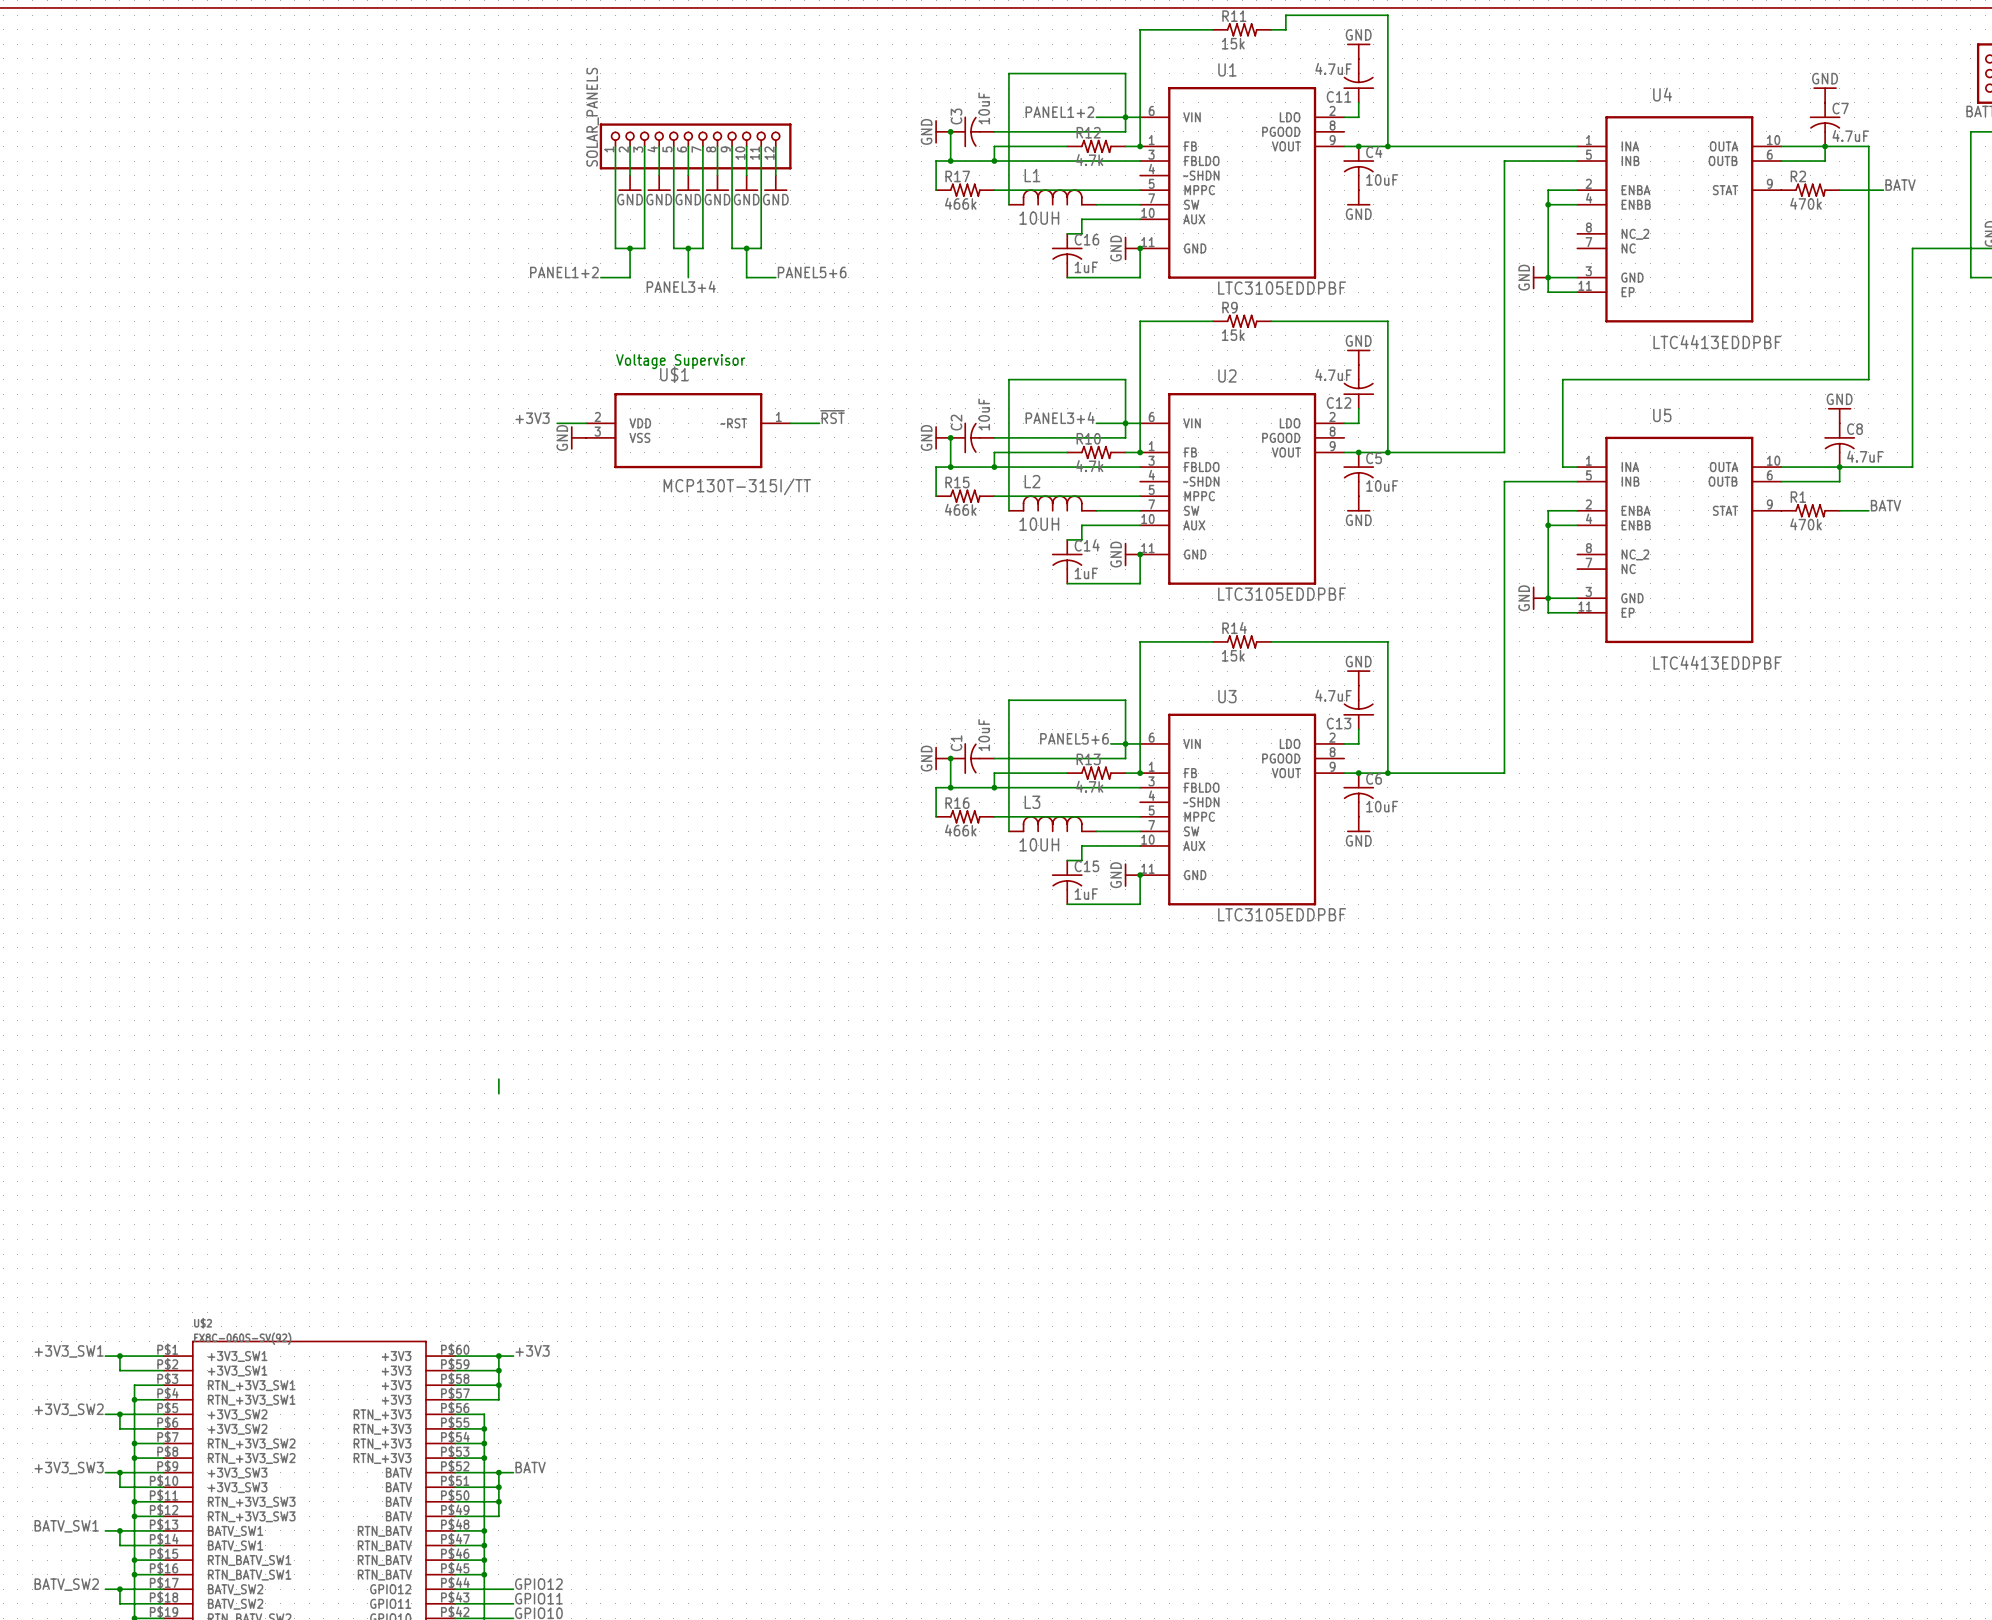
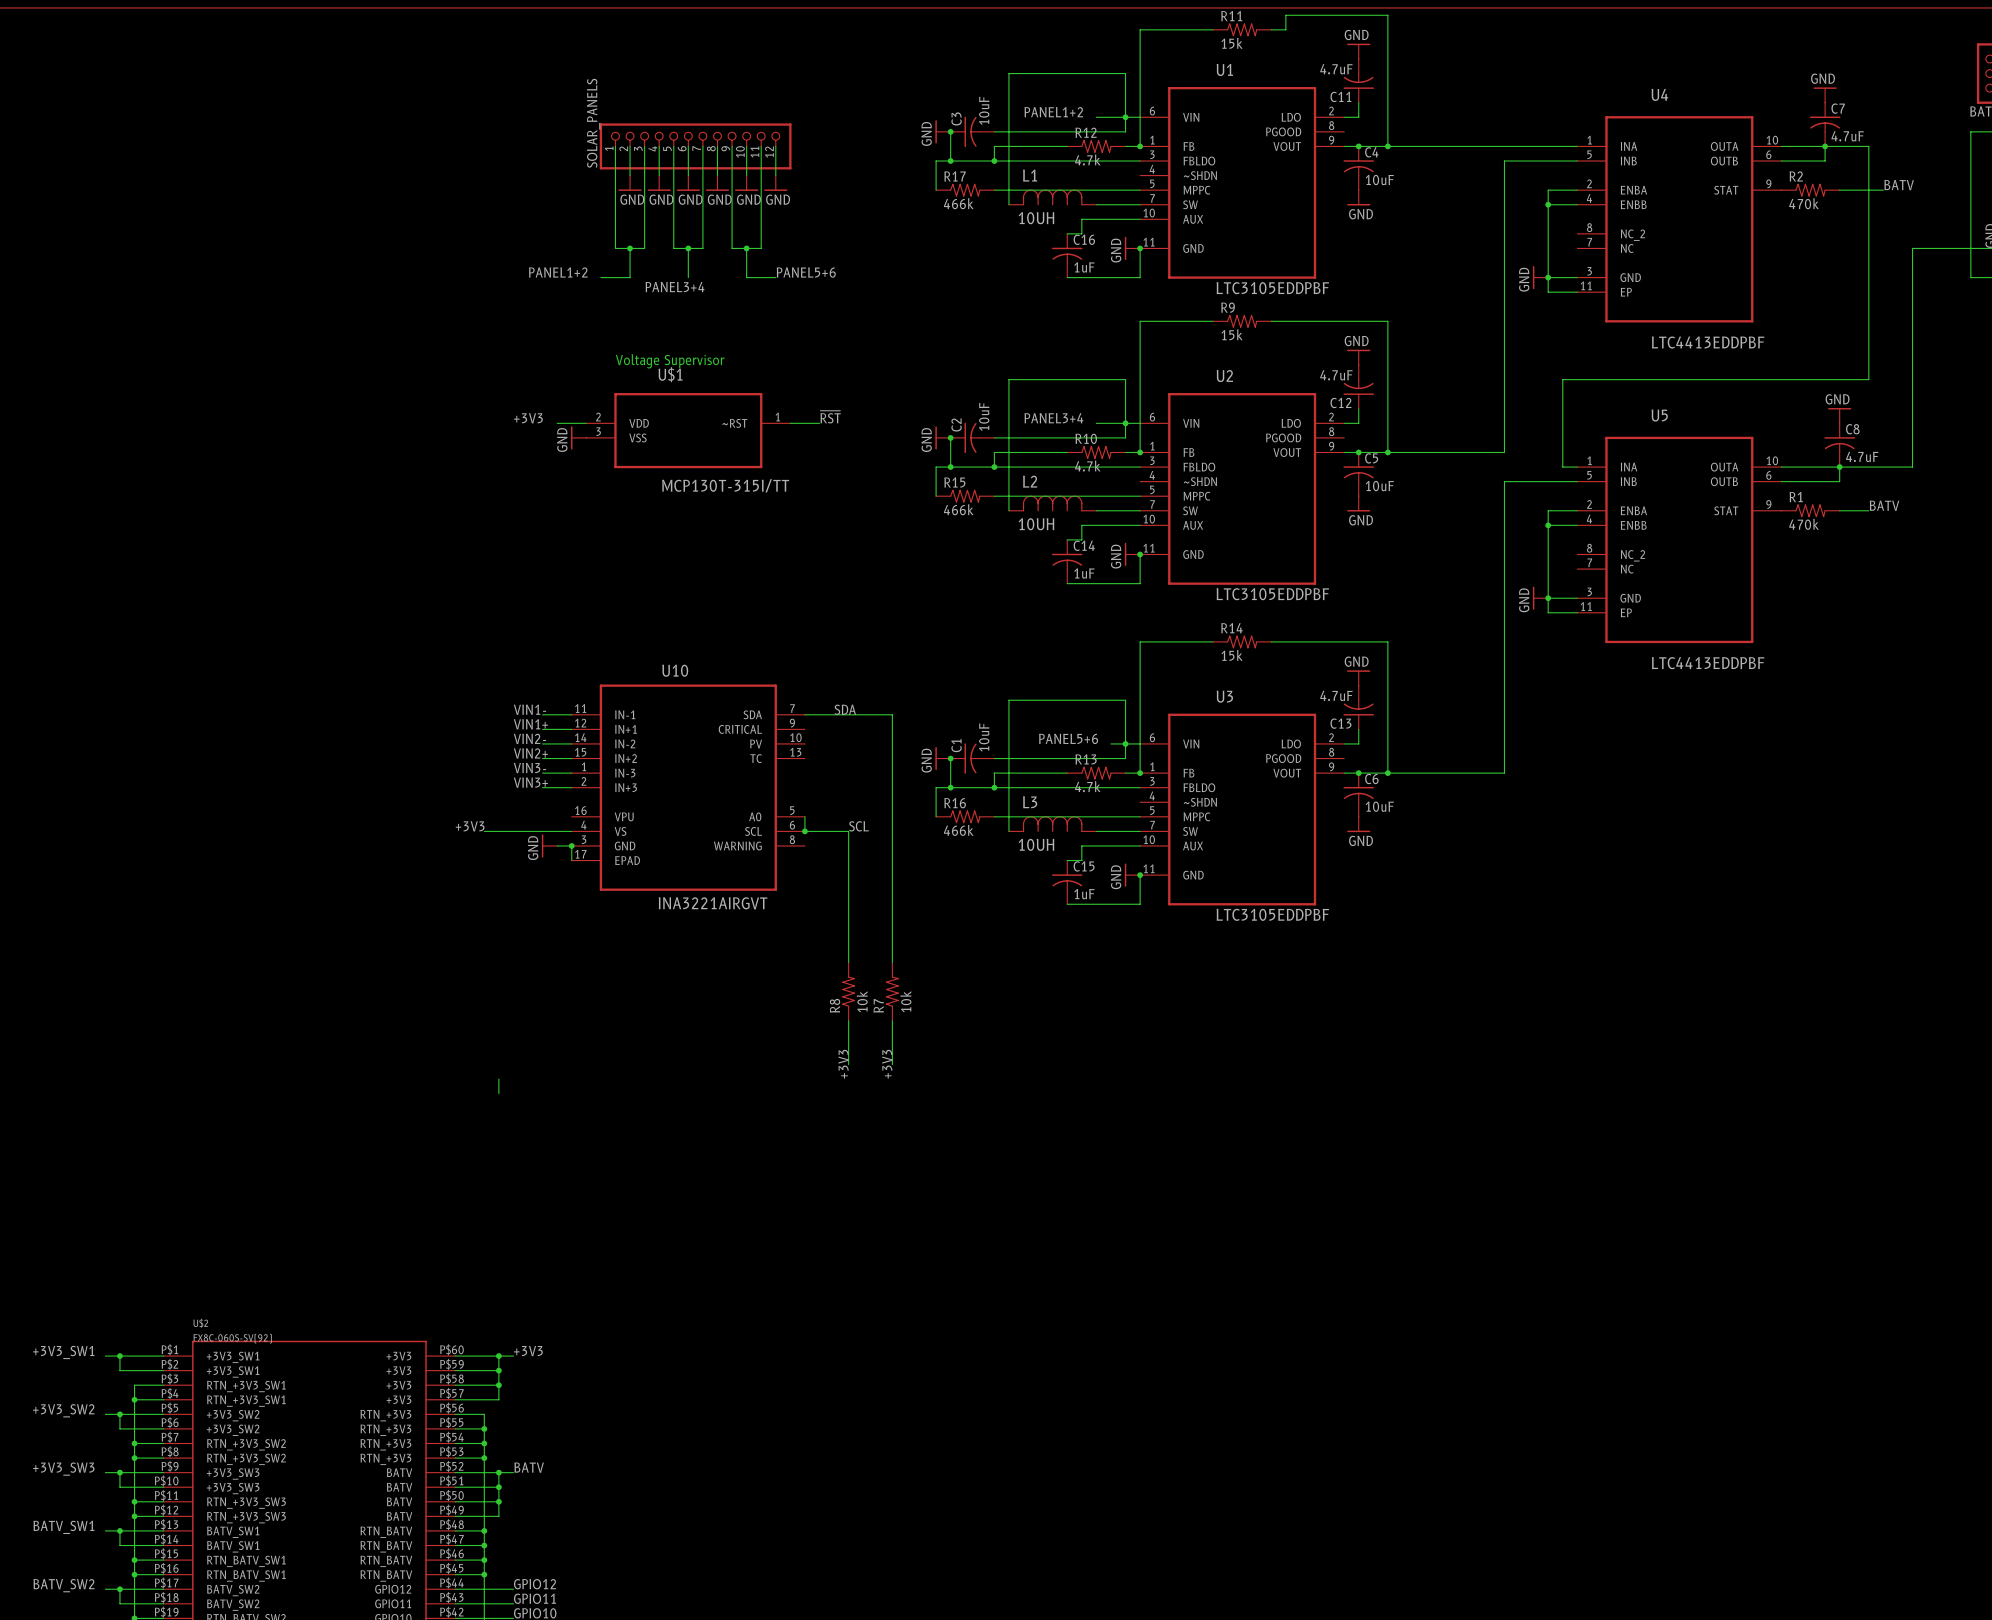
label: none -> VIN1- (529, 709)
label: none -> SDA (845, 709)
wire: none -> (542, 714) (571, 714)
wire: none -> (804, 714) (892, 714) (892, 962)
label: none -> VIN1+ (530, 724)
wire: none -> (542, 729) (571, 729)
label: none -> VIN2- (529, 738)
wire: none -> (542, 743) (571, 743)
label: none -> VIN2+ (530, 753)
wire: none -> (542, 758) (571, 758)
label: none -> VIN3- (529, 768)
wire: none -> (542, 773) (571, 773)
label: none -> VIN3+ (530, 782)
wire: none -> (542, 787) (571, 787)
U10: none -> INA3221AIRGVT (688, 787)
wire: none -> (804, 816) (804, 831) (848, 831) (848, 962)
label: none -> +3V3 (470, 826)
label: none -> SCL (858, 826)
wire: none -> (484, 831) (571, 831)
junction: none -> (804, 831)
power symbol: none -> GND (549, 845)
wire: none -> (557, 845) (571, 845) (571, 860)
junction: none -> (571, 845)
R8: none -> 10k (848, 991)
R7: none -> 10k (892, 991)
wire: none -> (848, 1020) (848, 1064)
wire: none -> (892, 1020) (892, 1064)
label: none -> +3V3 (843, 1064)
label: none -> +3V3 (887, 1064)

